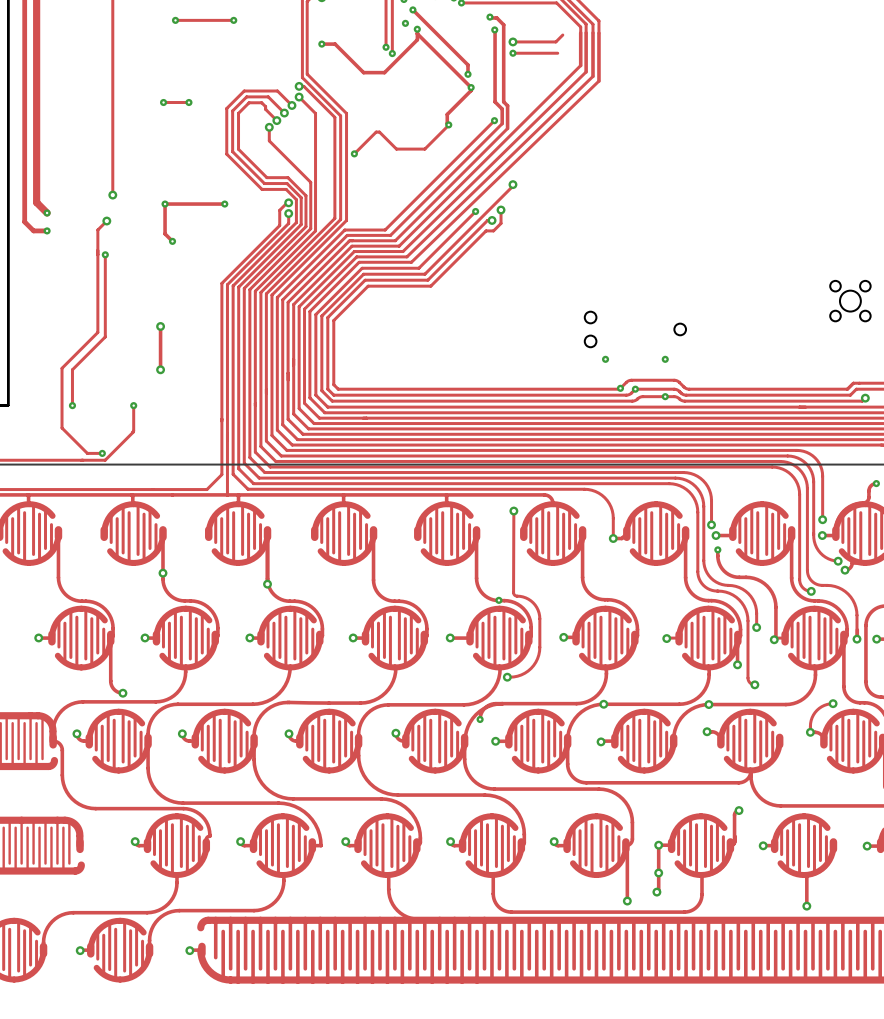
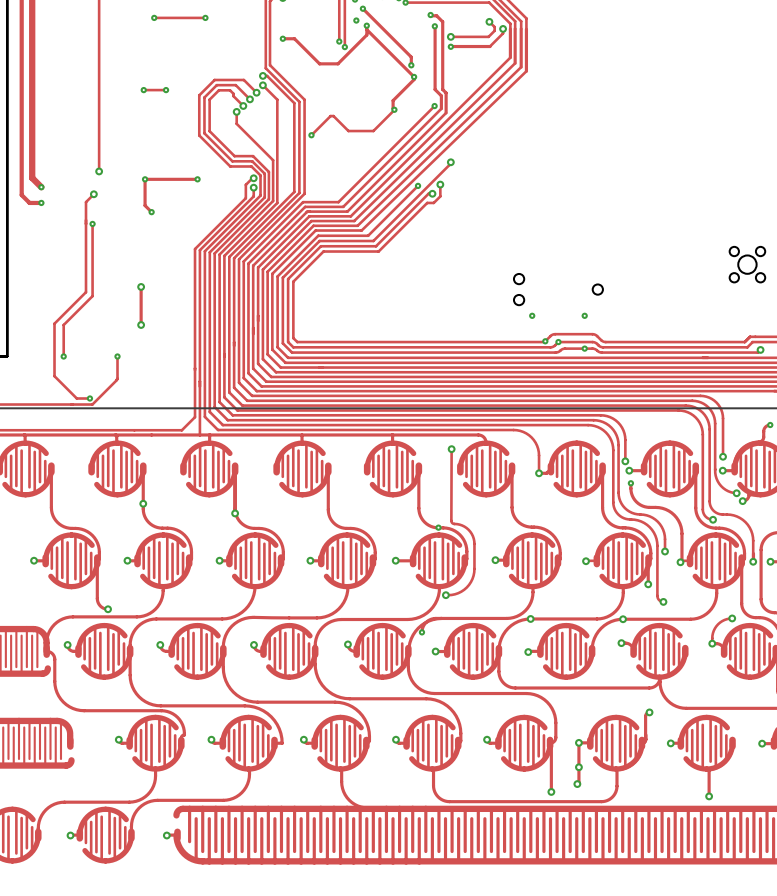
track: none -> (489, 21) (494, 27) (494, 30)
via: none -> (489, 21)
track: none -> (503, 28) (503, 33) (490, 46) (450, 46)
via: none -> (503, 28)

